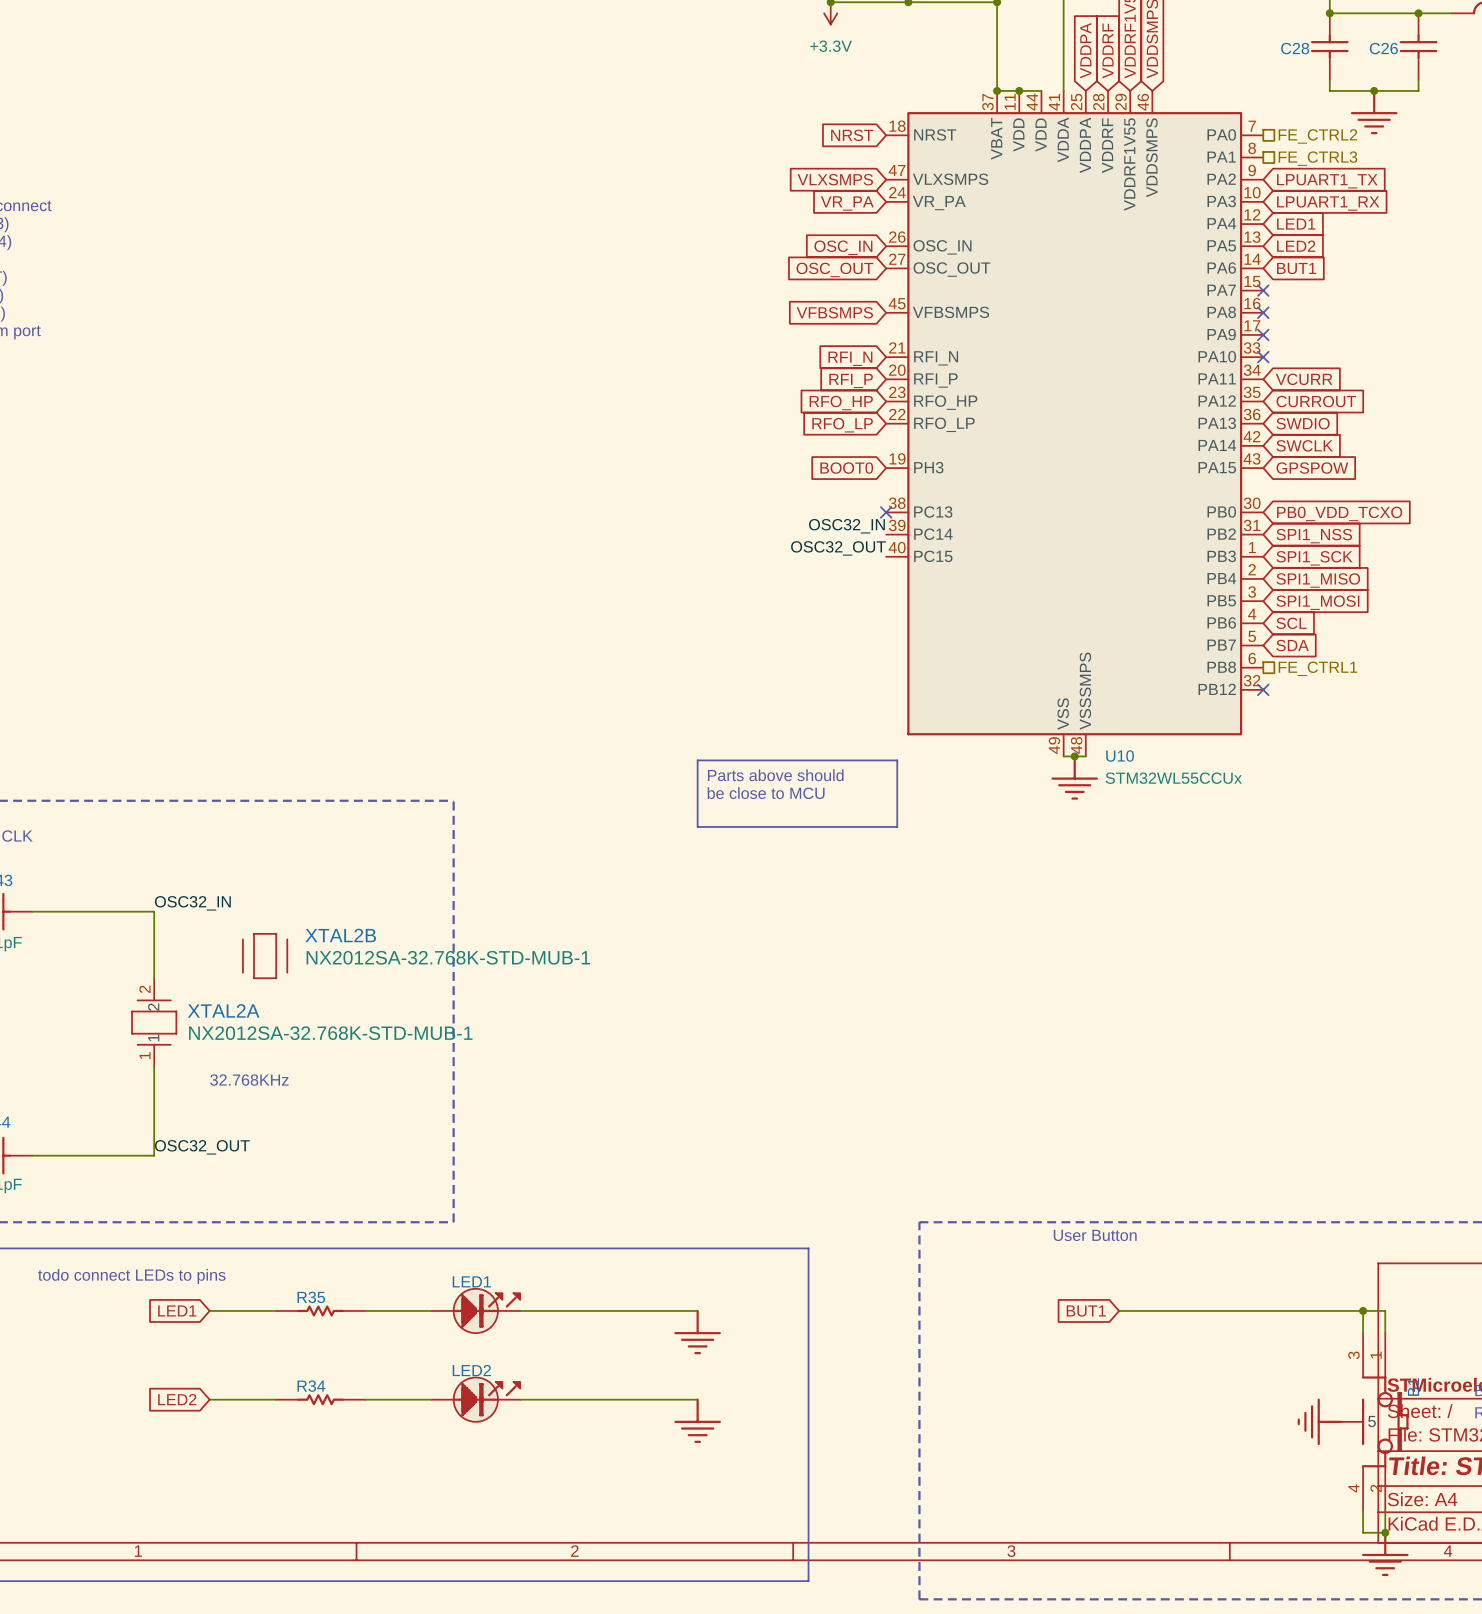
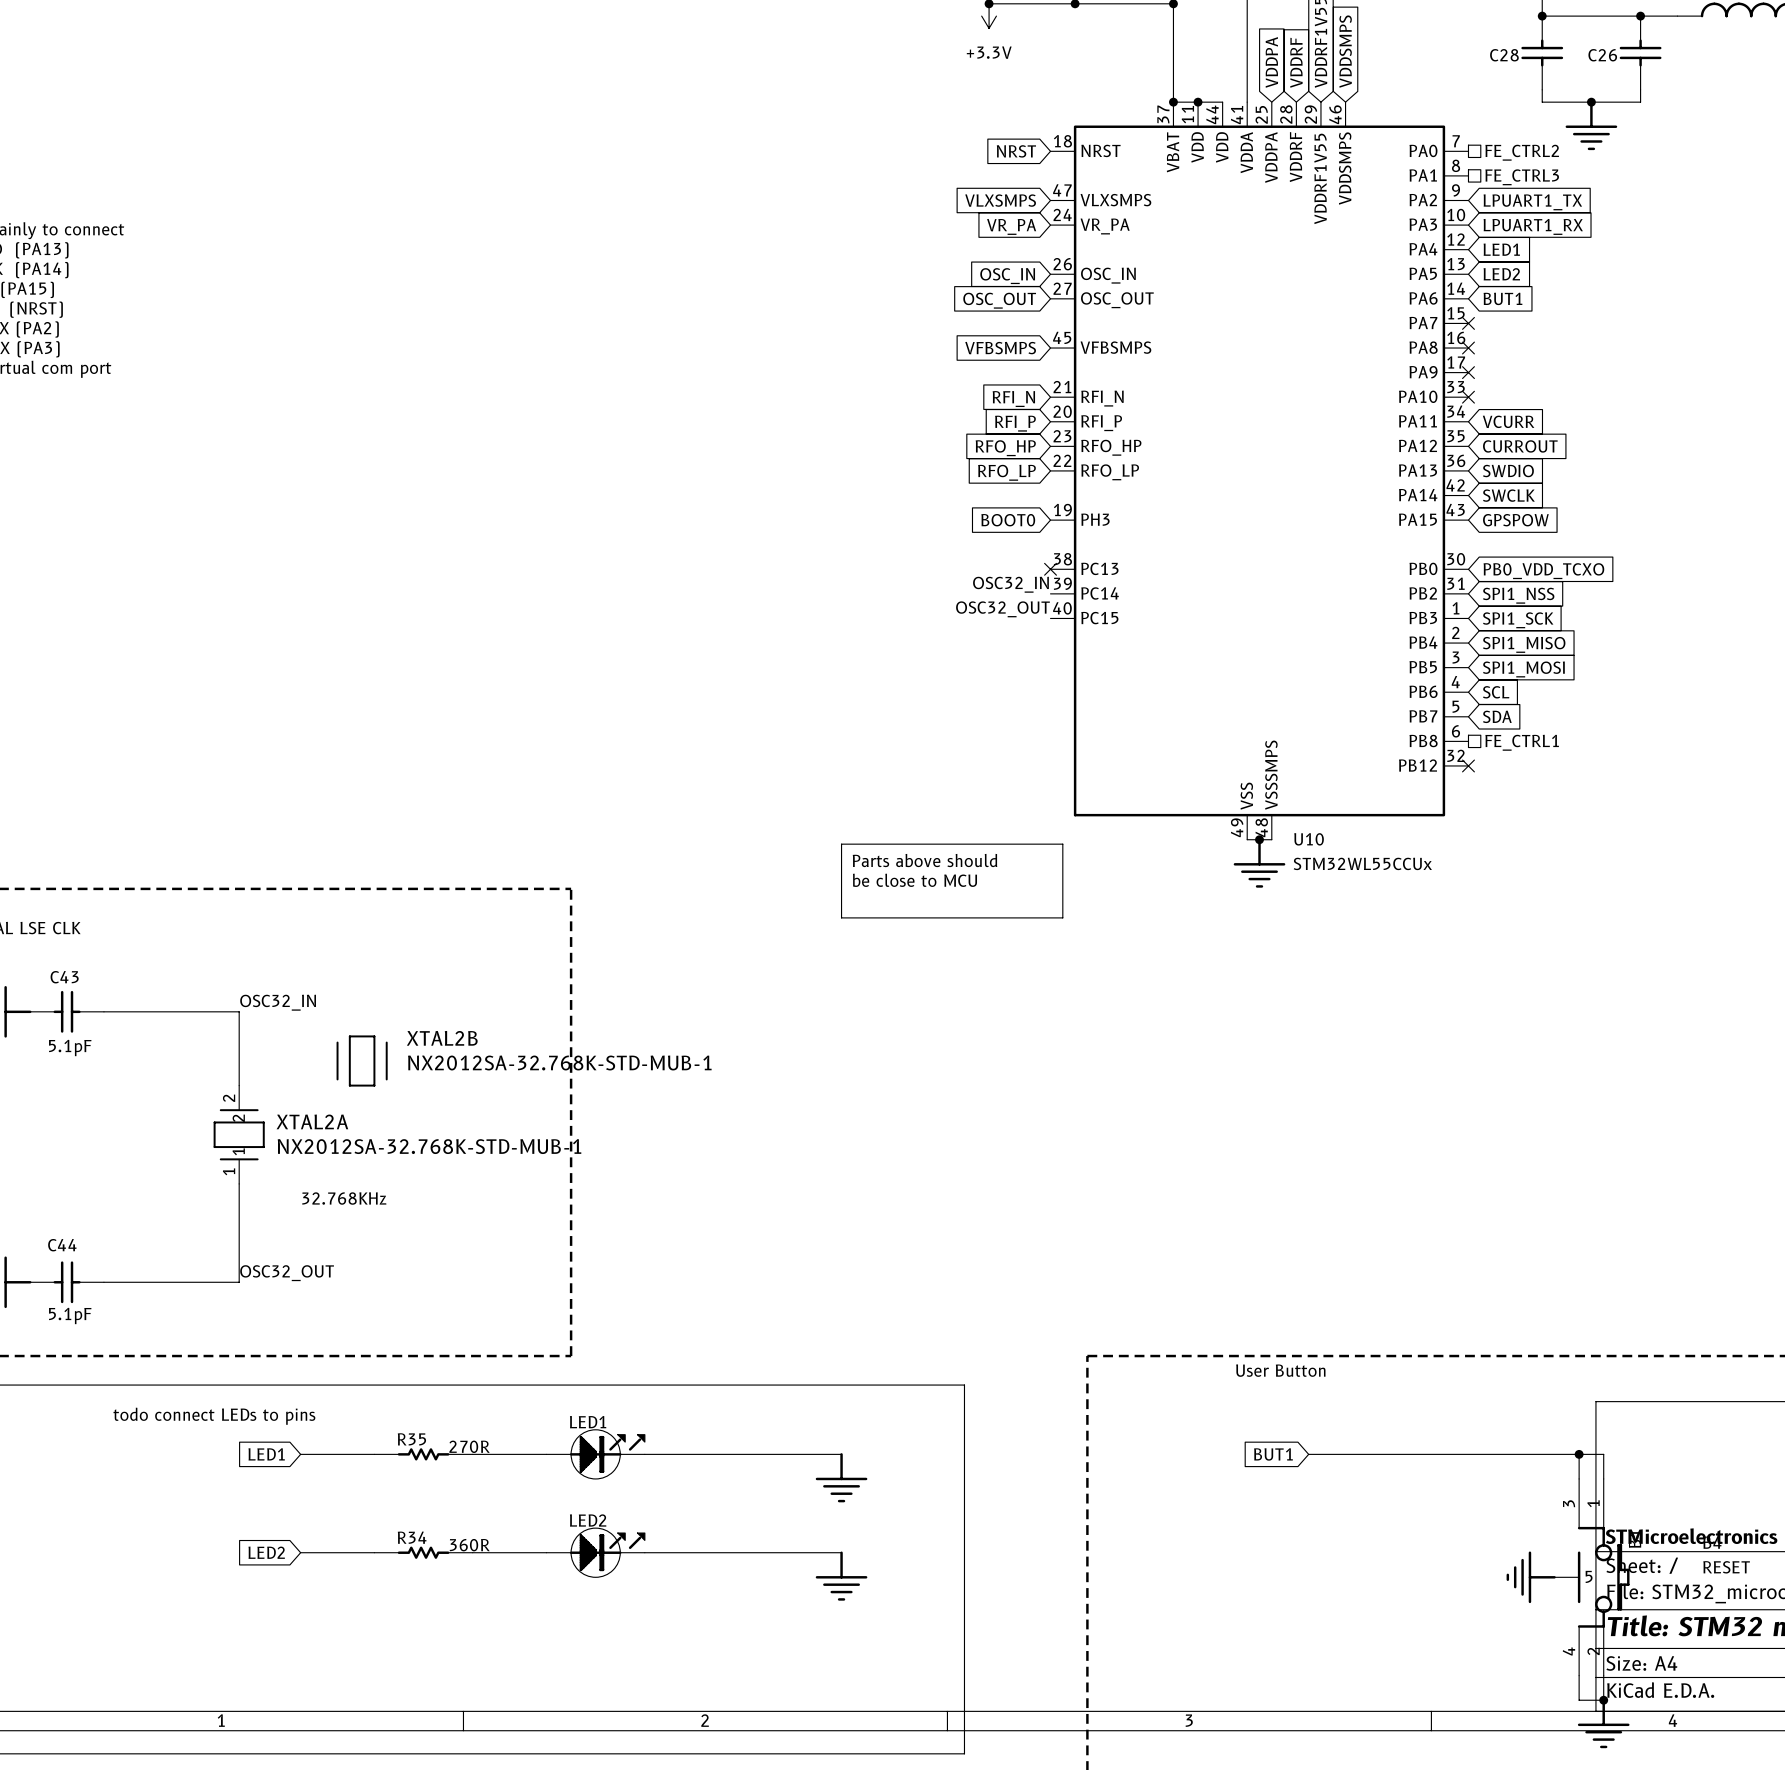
R35 value: none -> 270R (469, 1446)
R34 value: none -> 360R (469, 1545)

